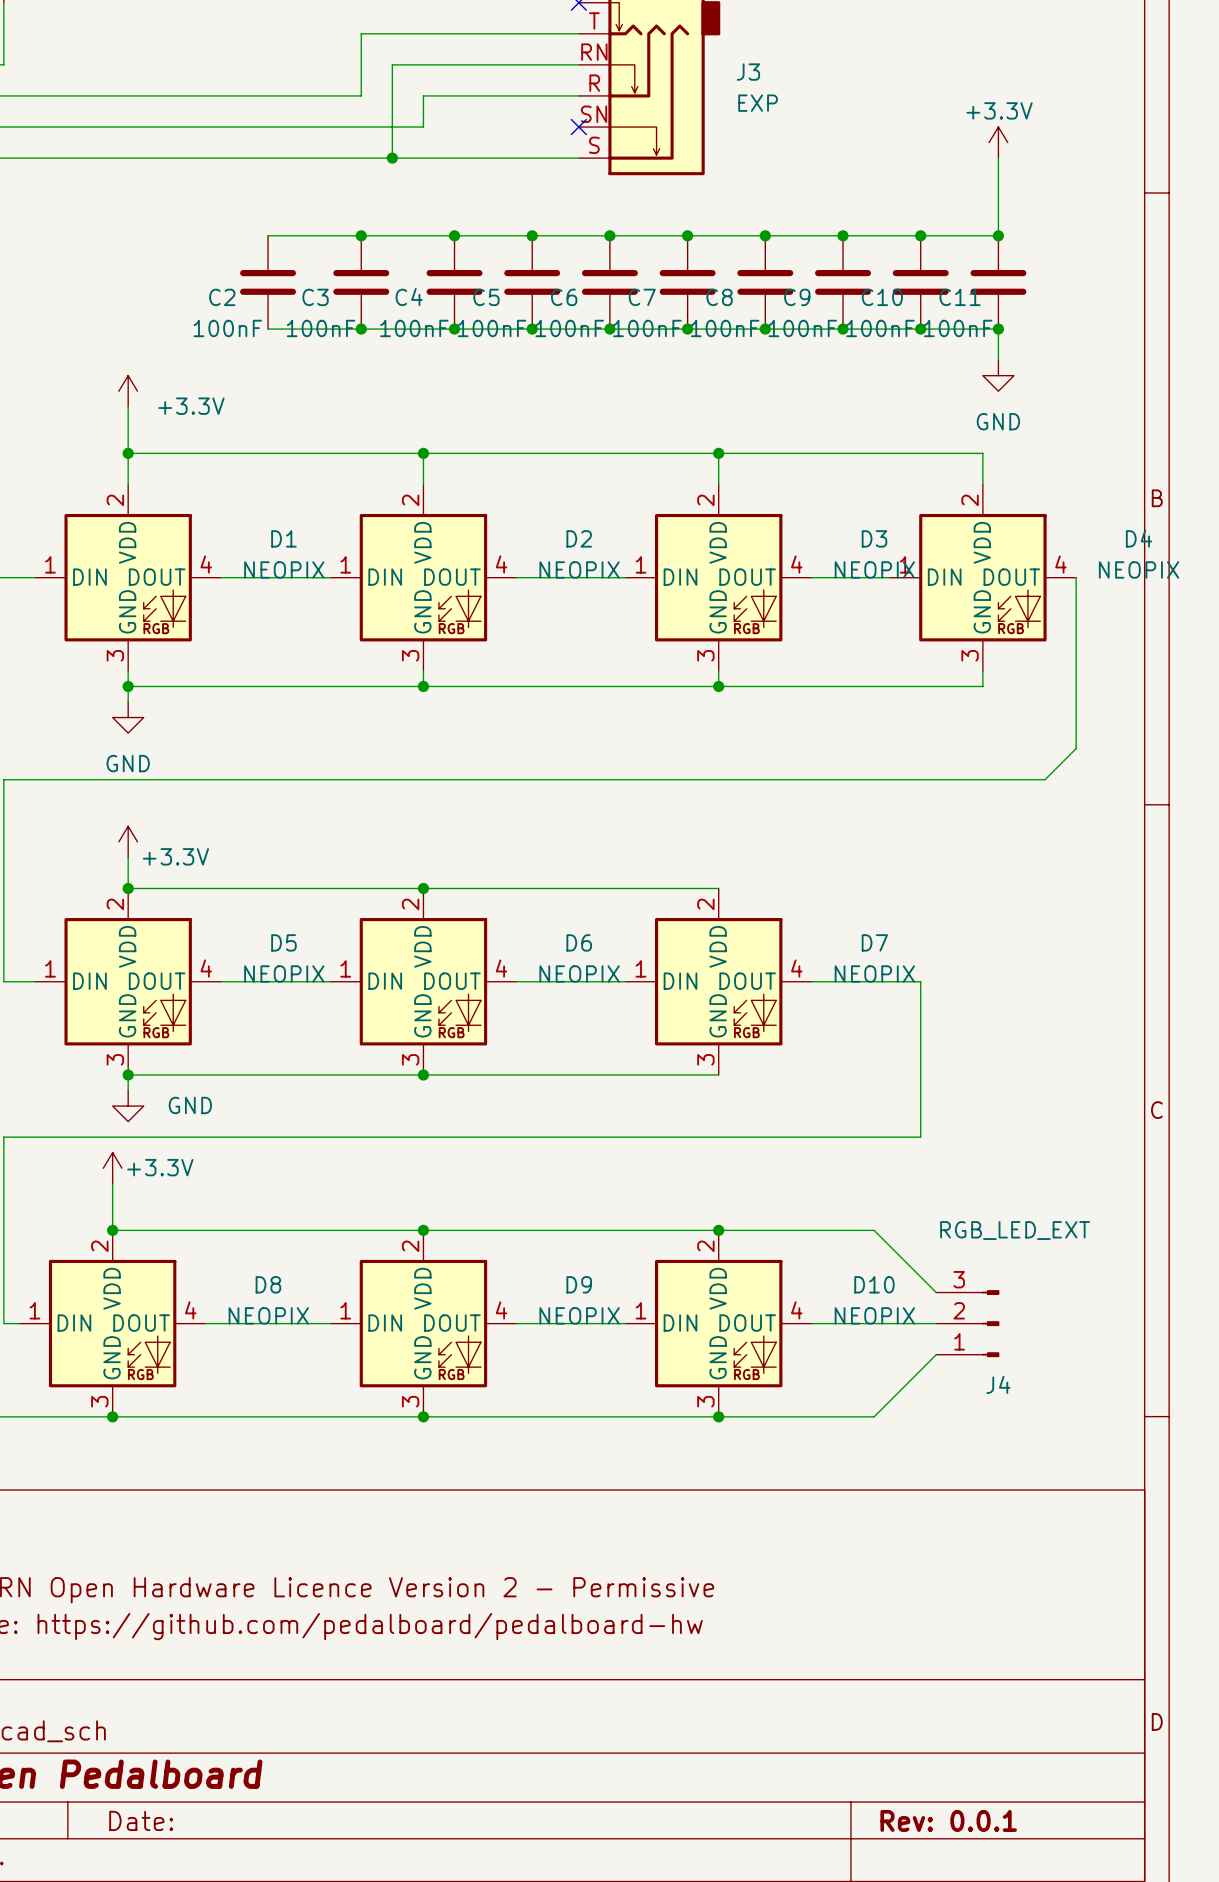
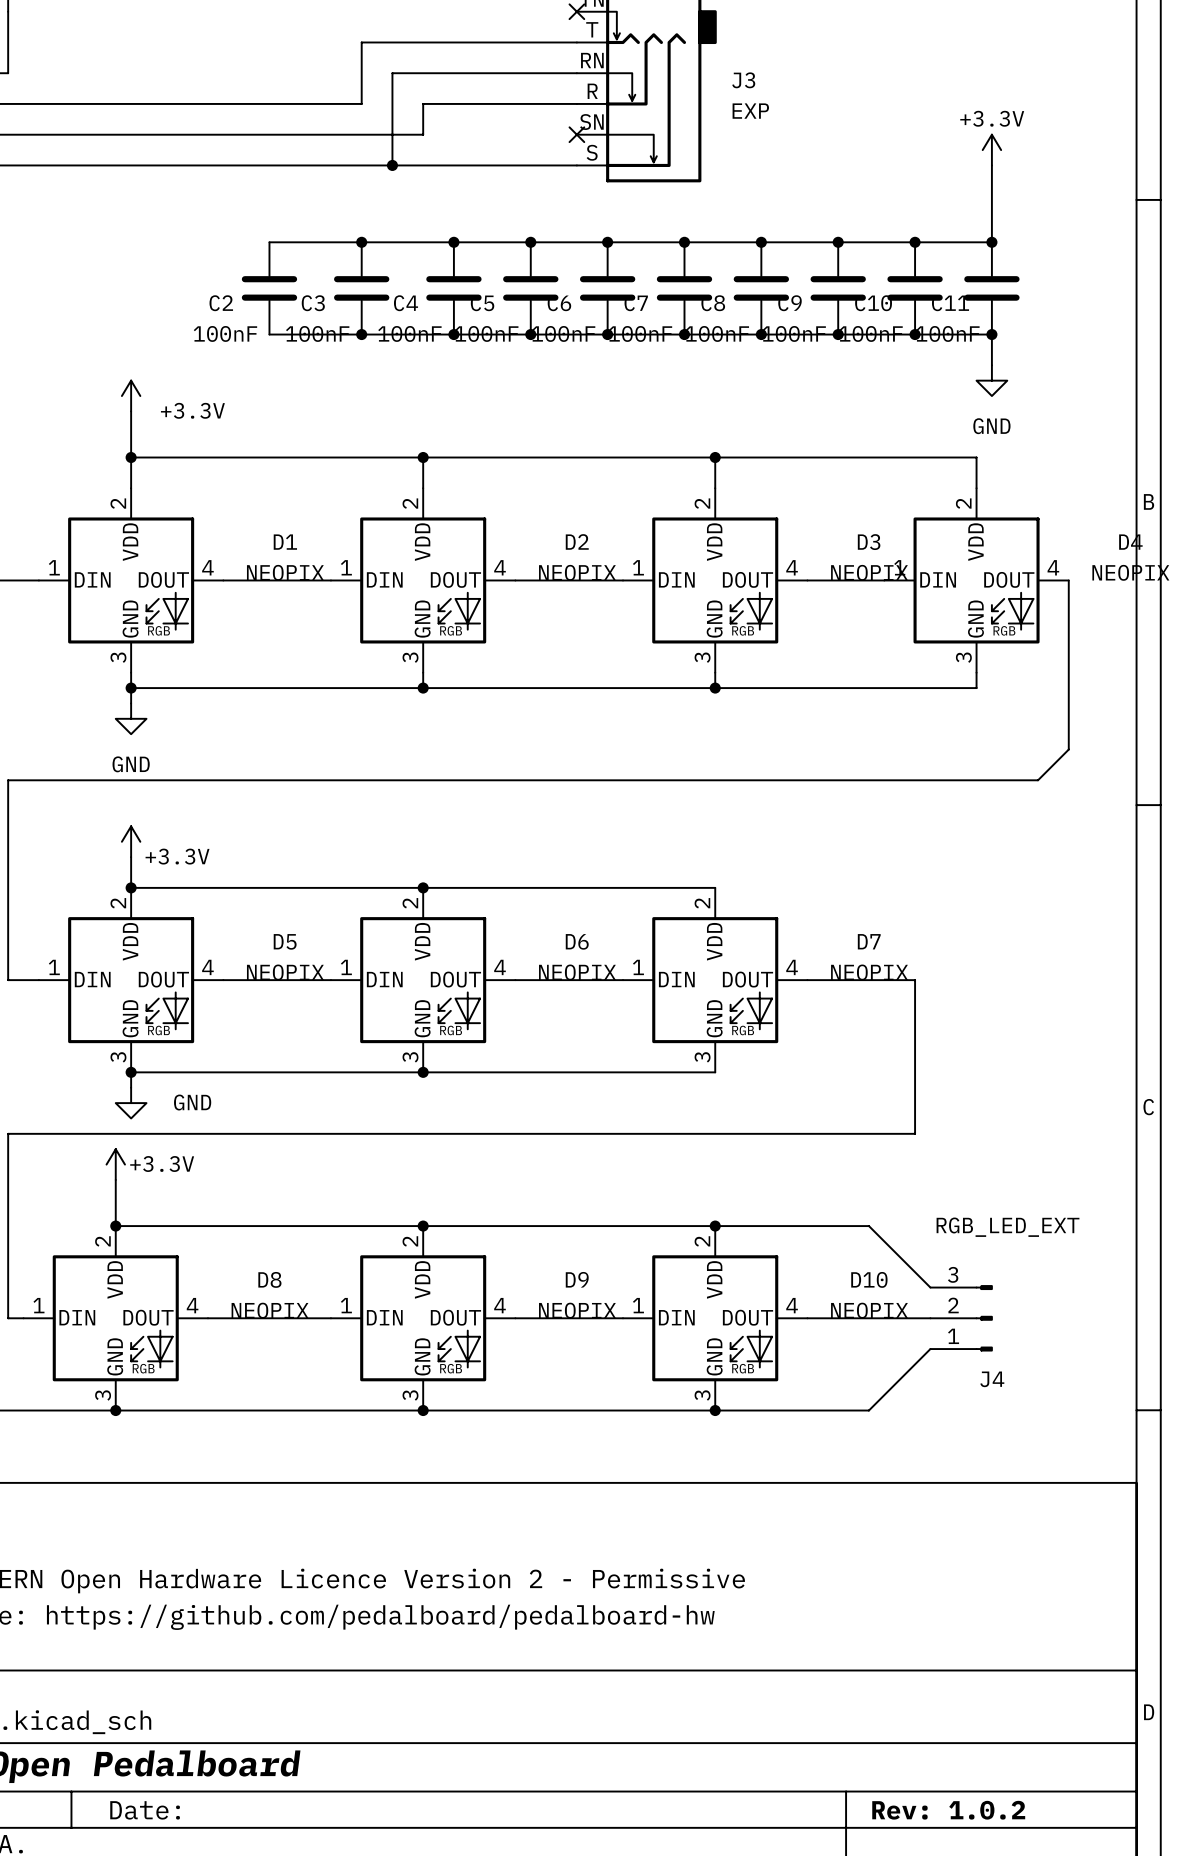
title block: Rev: 0.0.1 (948, 1820) -> Rev: 1.0.2 (948, 1810)

